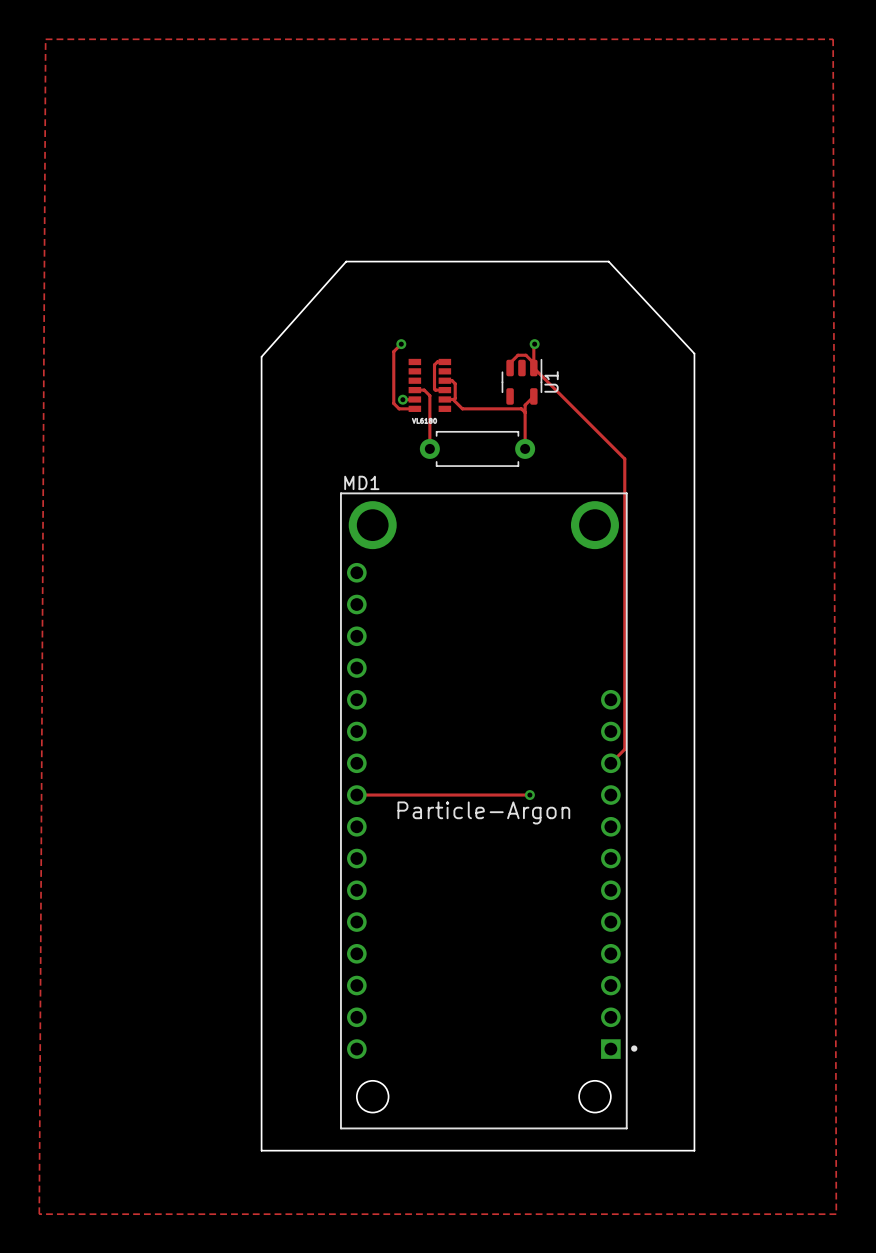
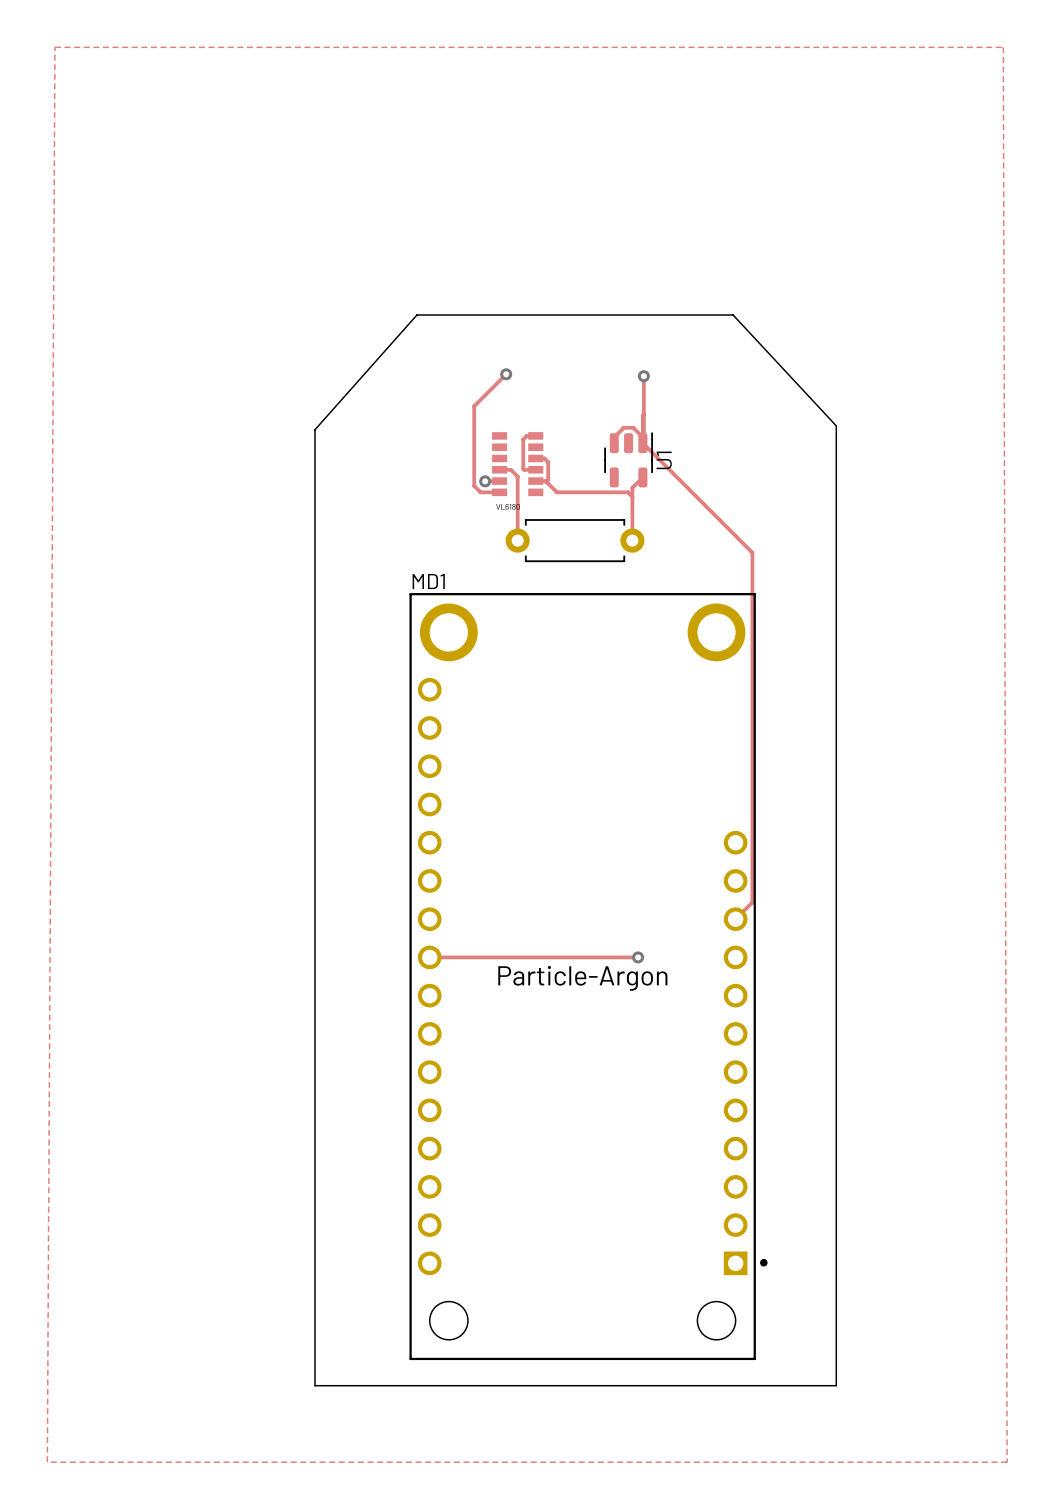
track: none -> (643, 376) (643, 442)
track: (401, 344) (393, 351) -> (506, 374) (474, 406) (474, 423)
via position: (401, 344) -> (506, 374)
via position: (534, 344) -> (643, 376)

